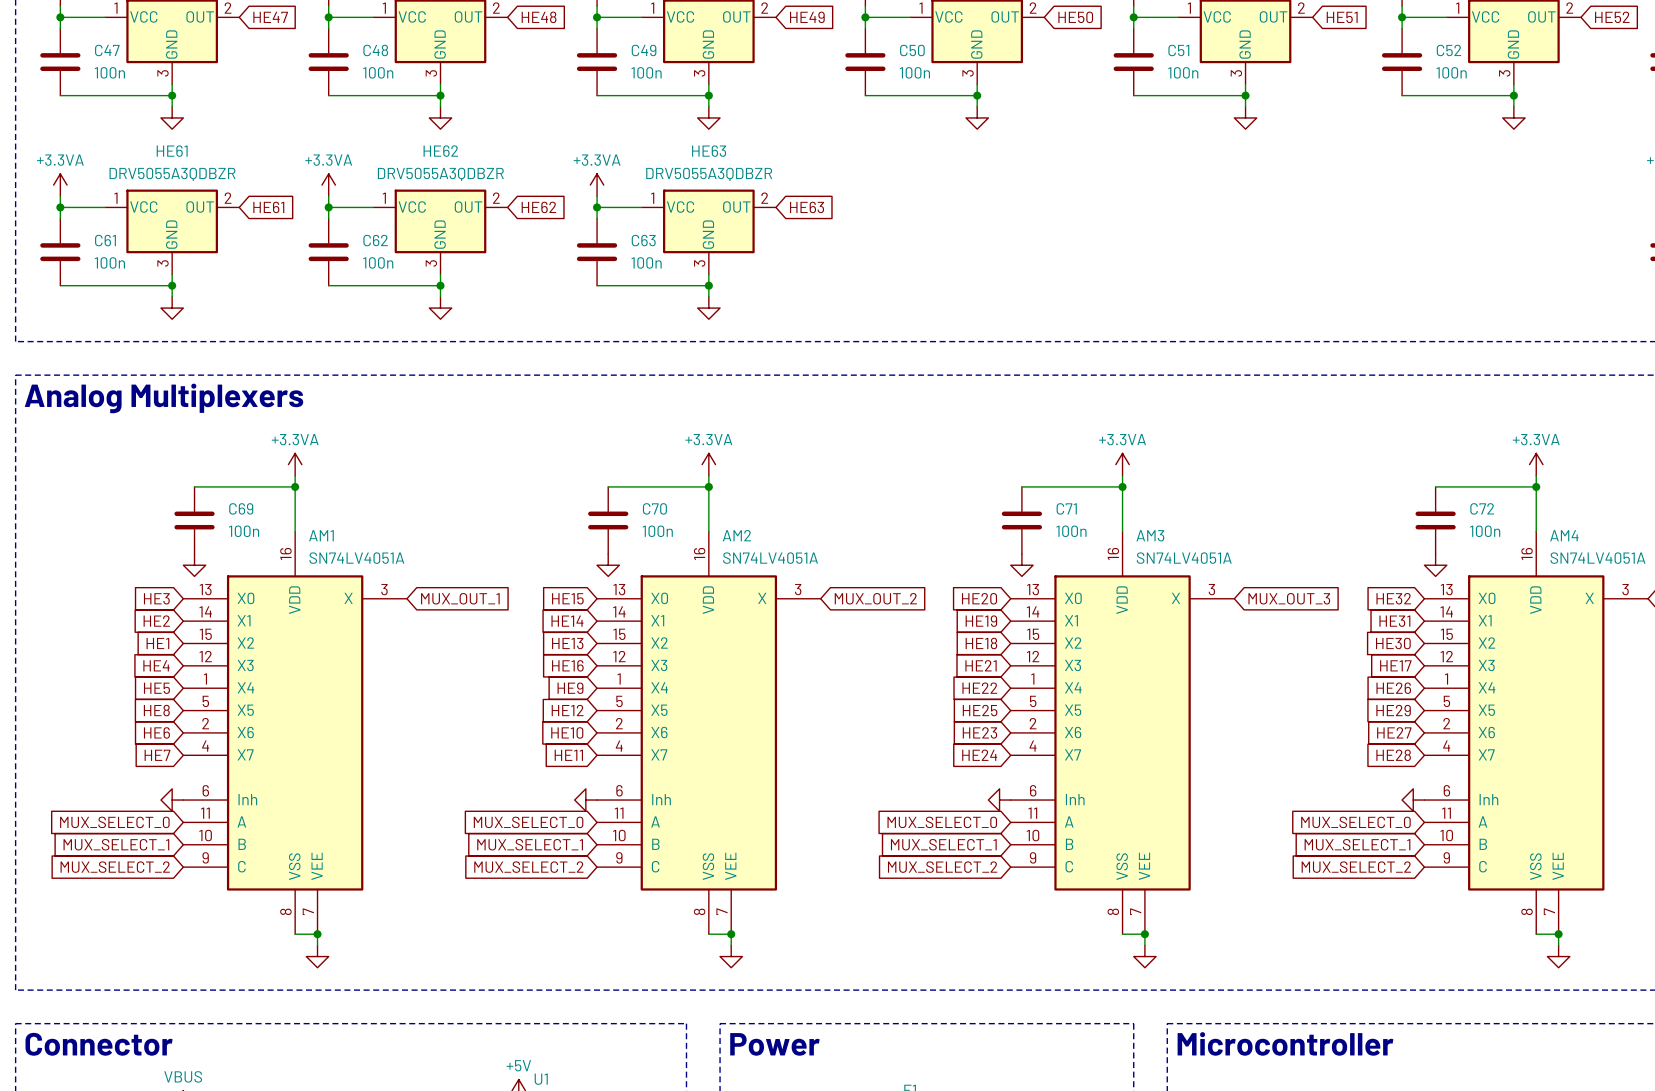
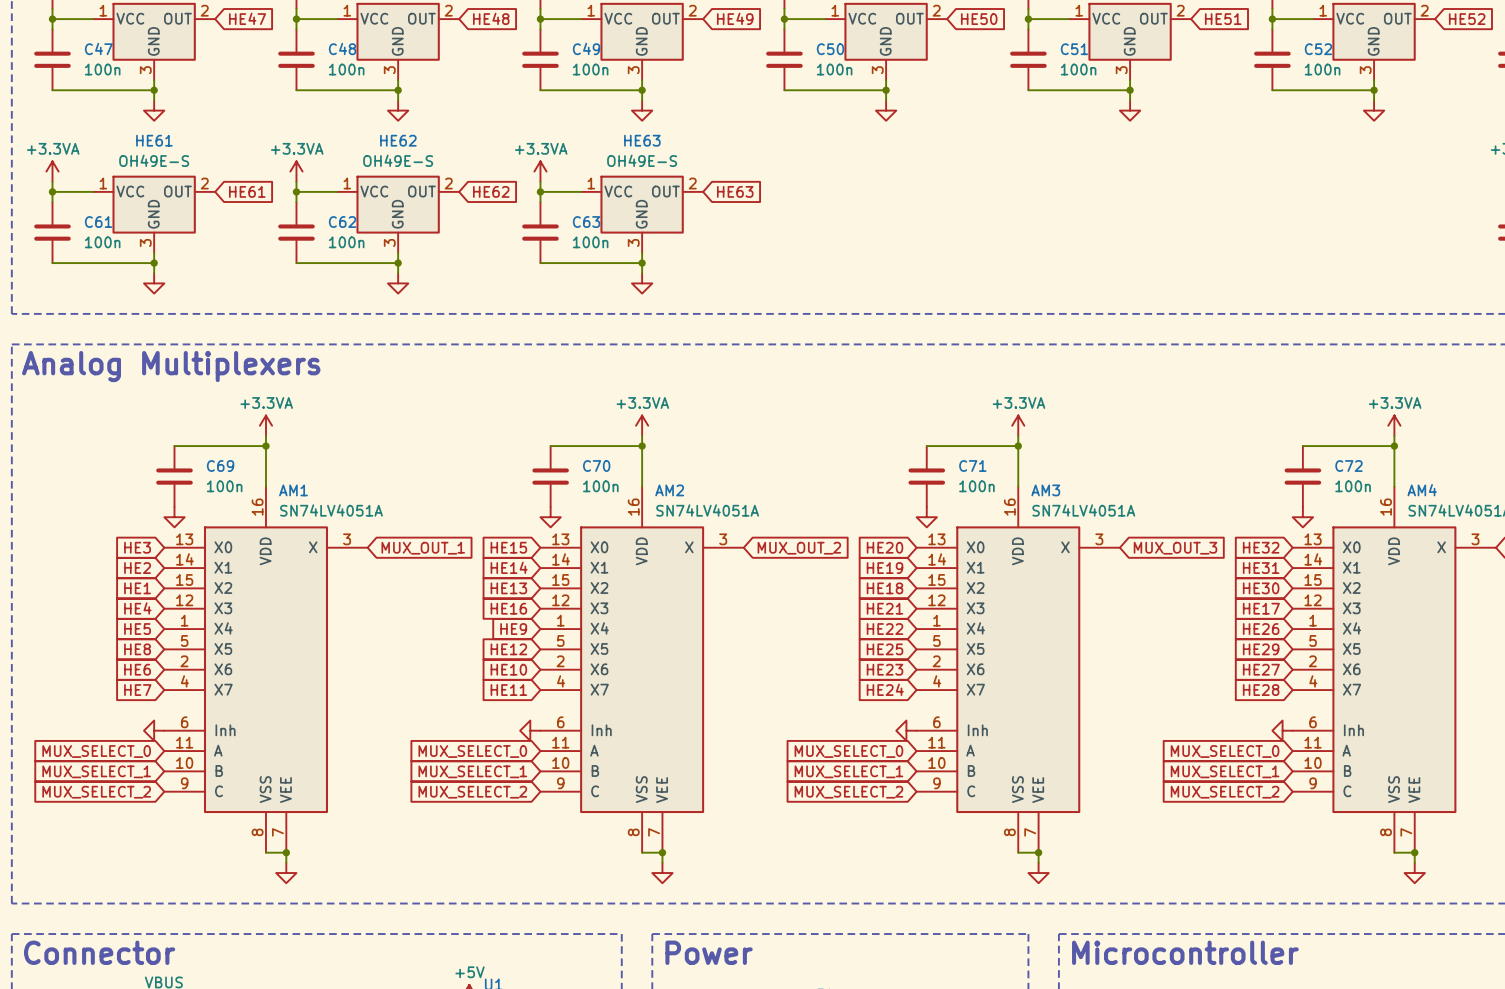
HE61 value: DRV5055A3QDBZR (172, 174) -> OH49E-S (154, 160)
HE62 value: DRV5055A3QDBZR (440, 174) -> OH49E-S (398, 160)
HE63 value: DRV5055A3QDBZR (709, 174) -> OH49E-S (642, 160)

